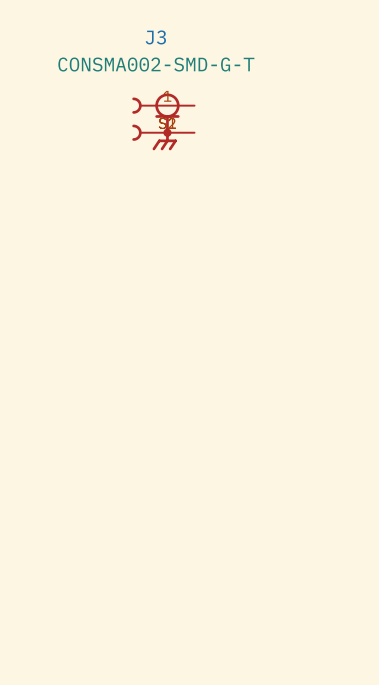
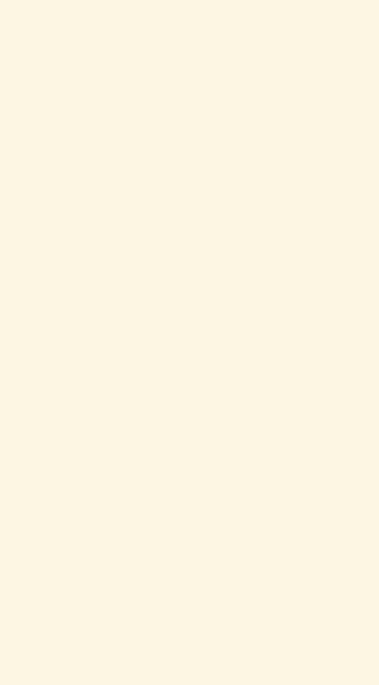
J3: CONSMA002-SMD-G-T (163, 121) -> none

